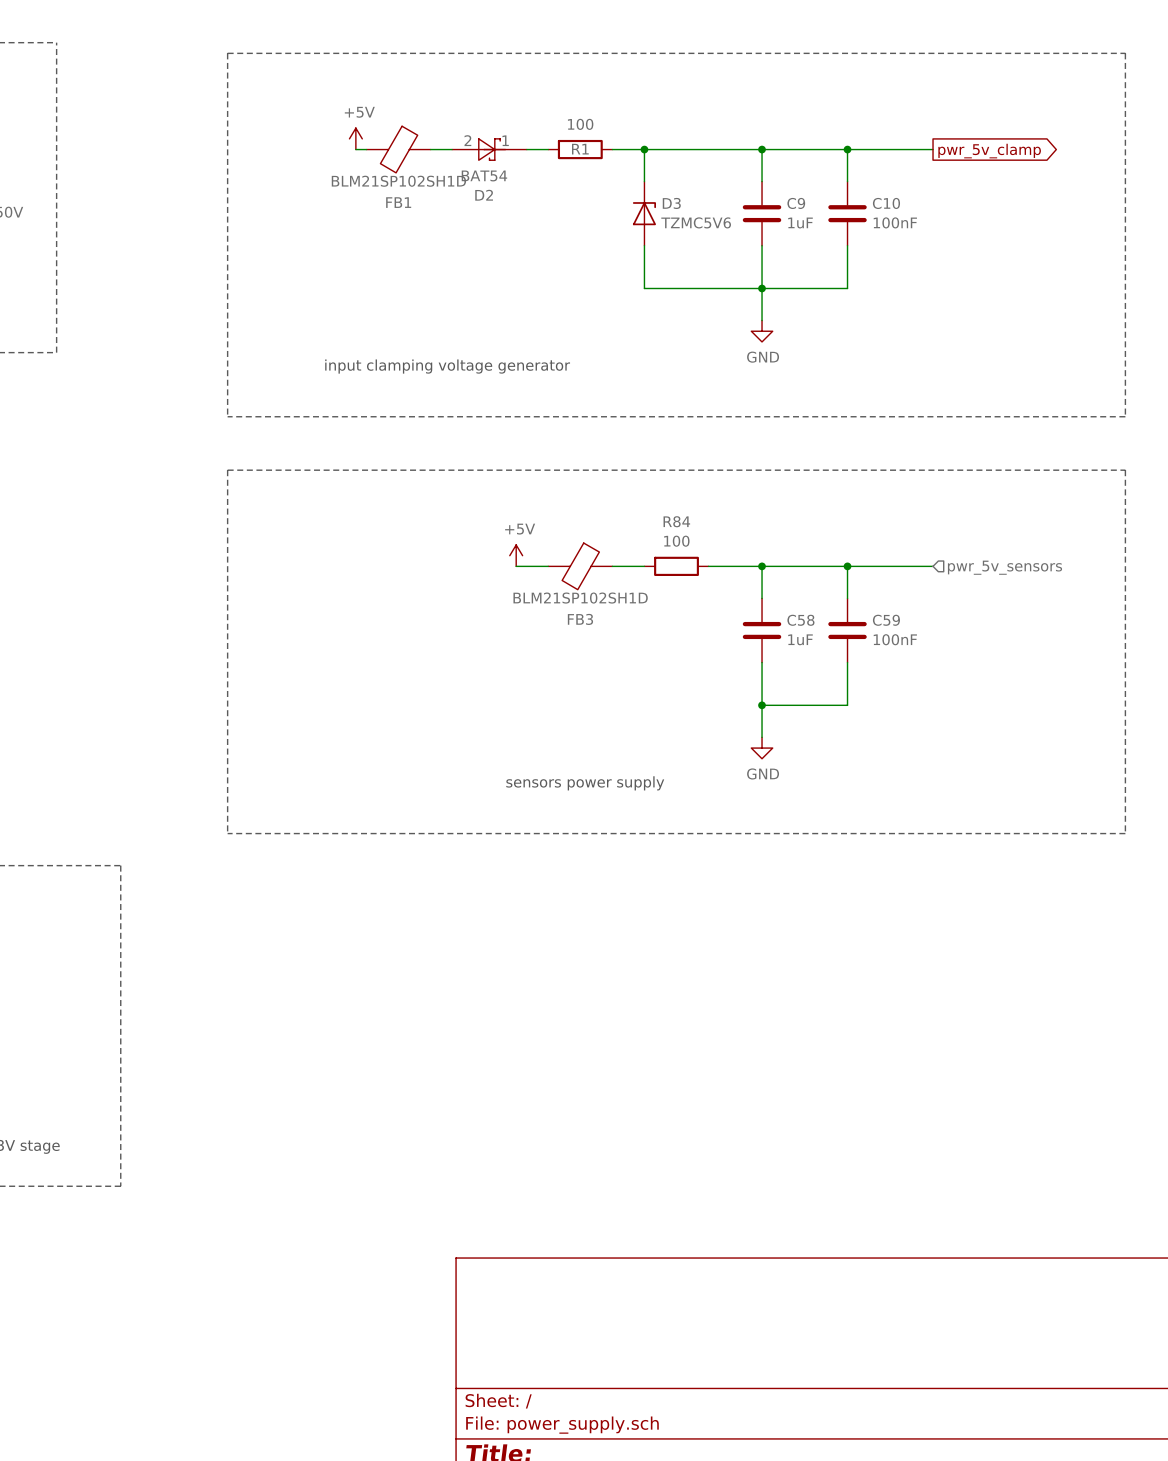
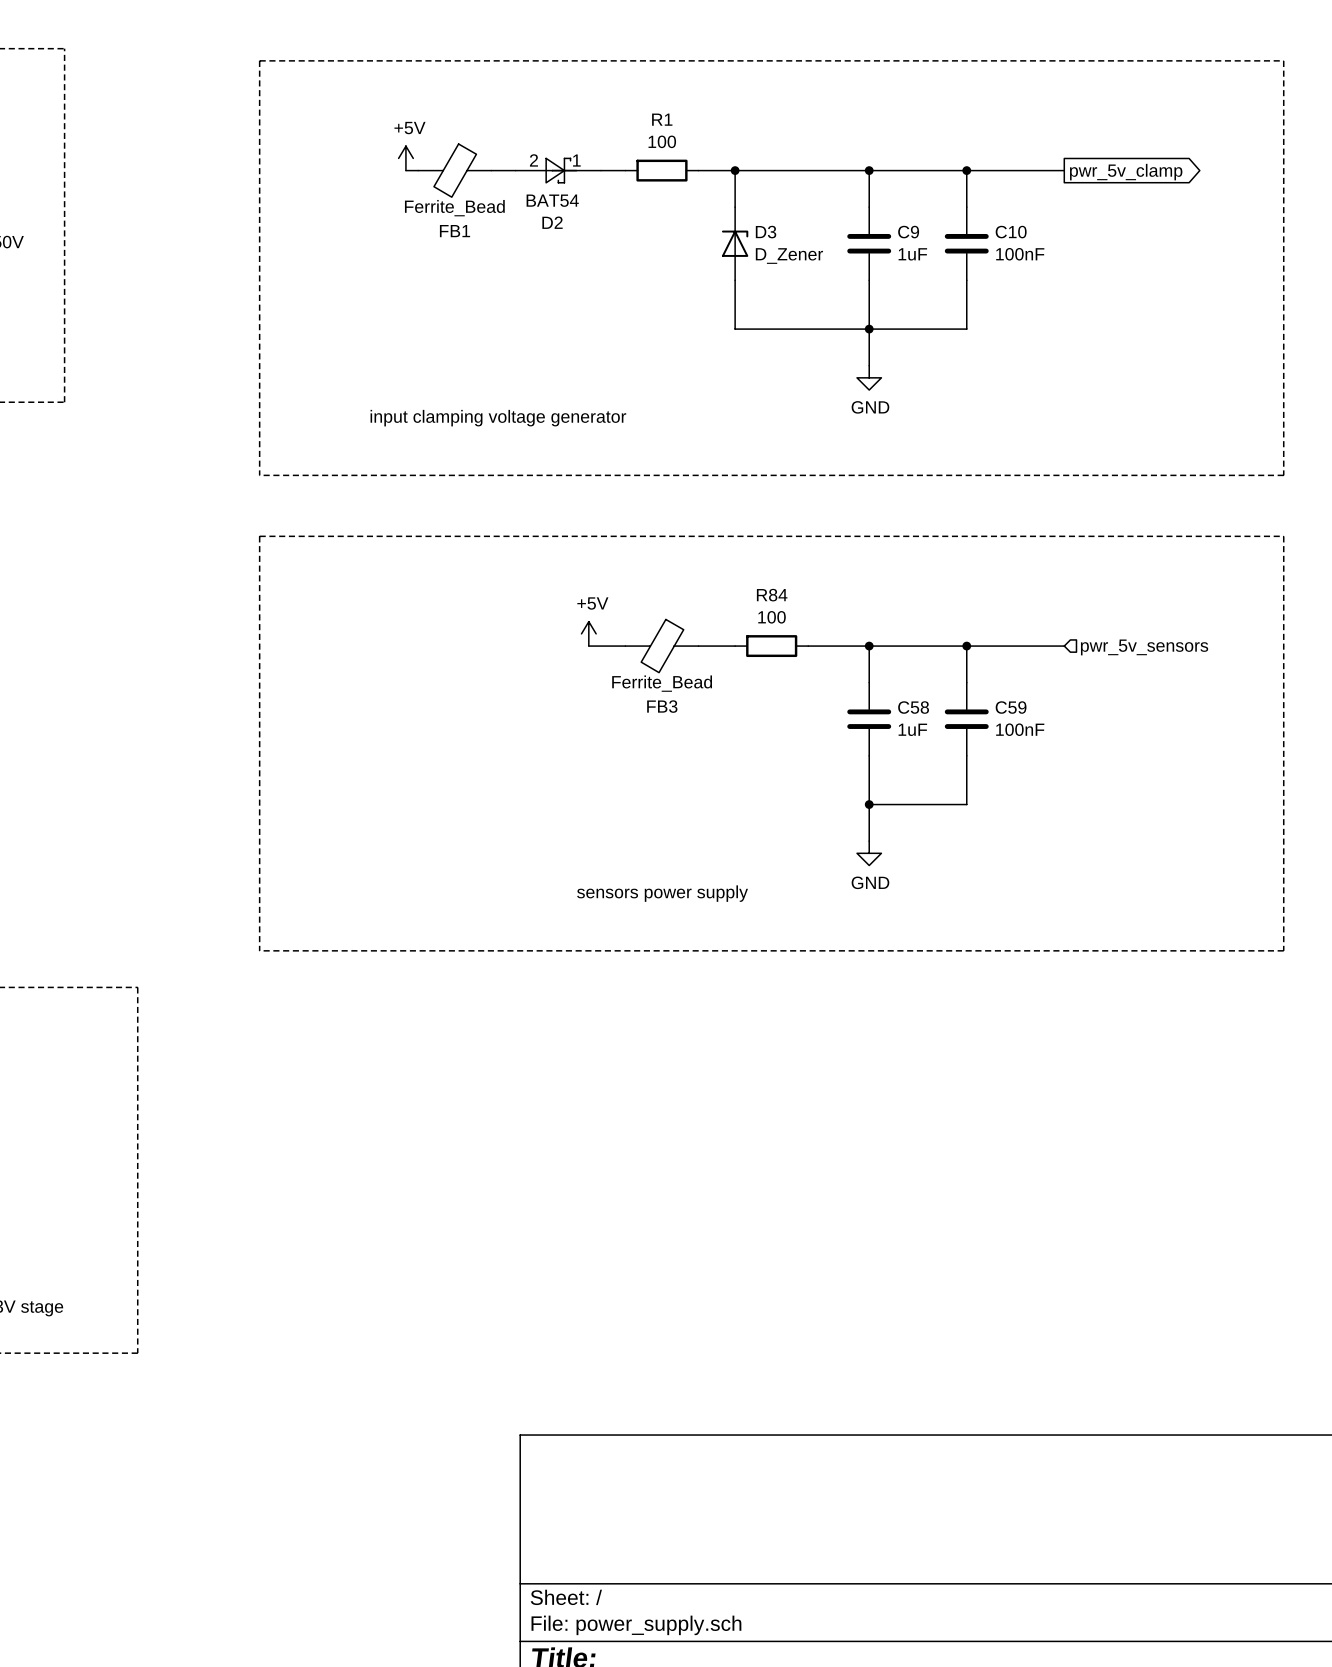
R1 name position: R1 (580, 149) -> R1 (662, 119)
FB1 value: BLM21SP102SH1D (398, 181) -> Ferrite_Bead (454, 208)
D3 value: TZMC5V6 (696, 222) -> D_Zener (789, 256)
FB3 value: BLM21SP102SH1D (580, 598) -> Ferrite_Bead (662, 683)

